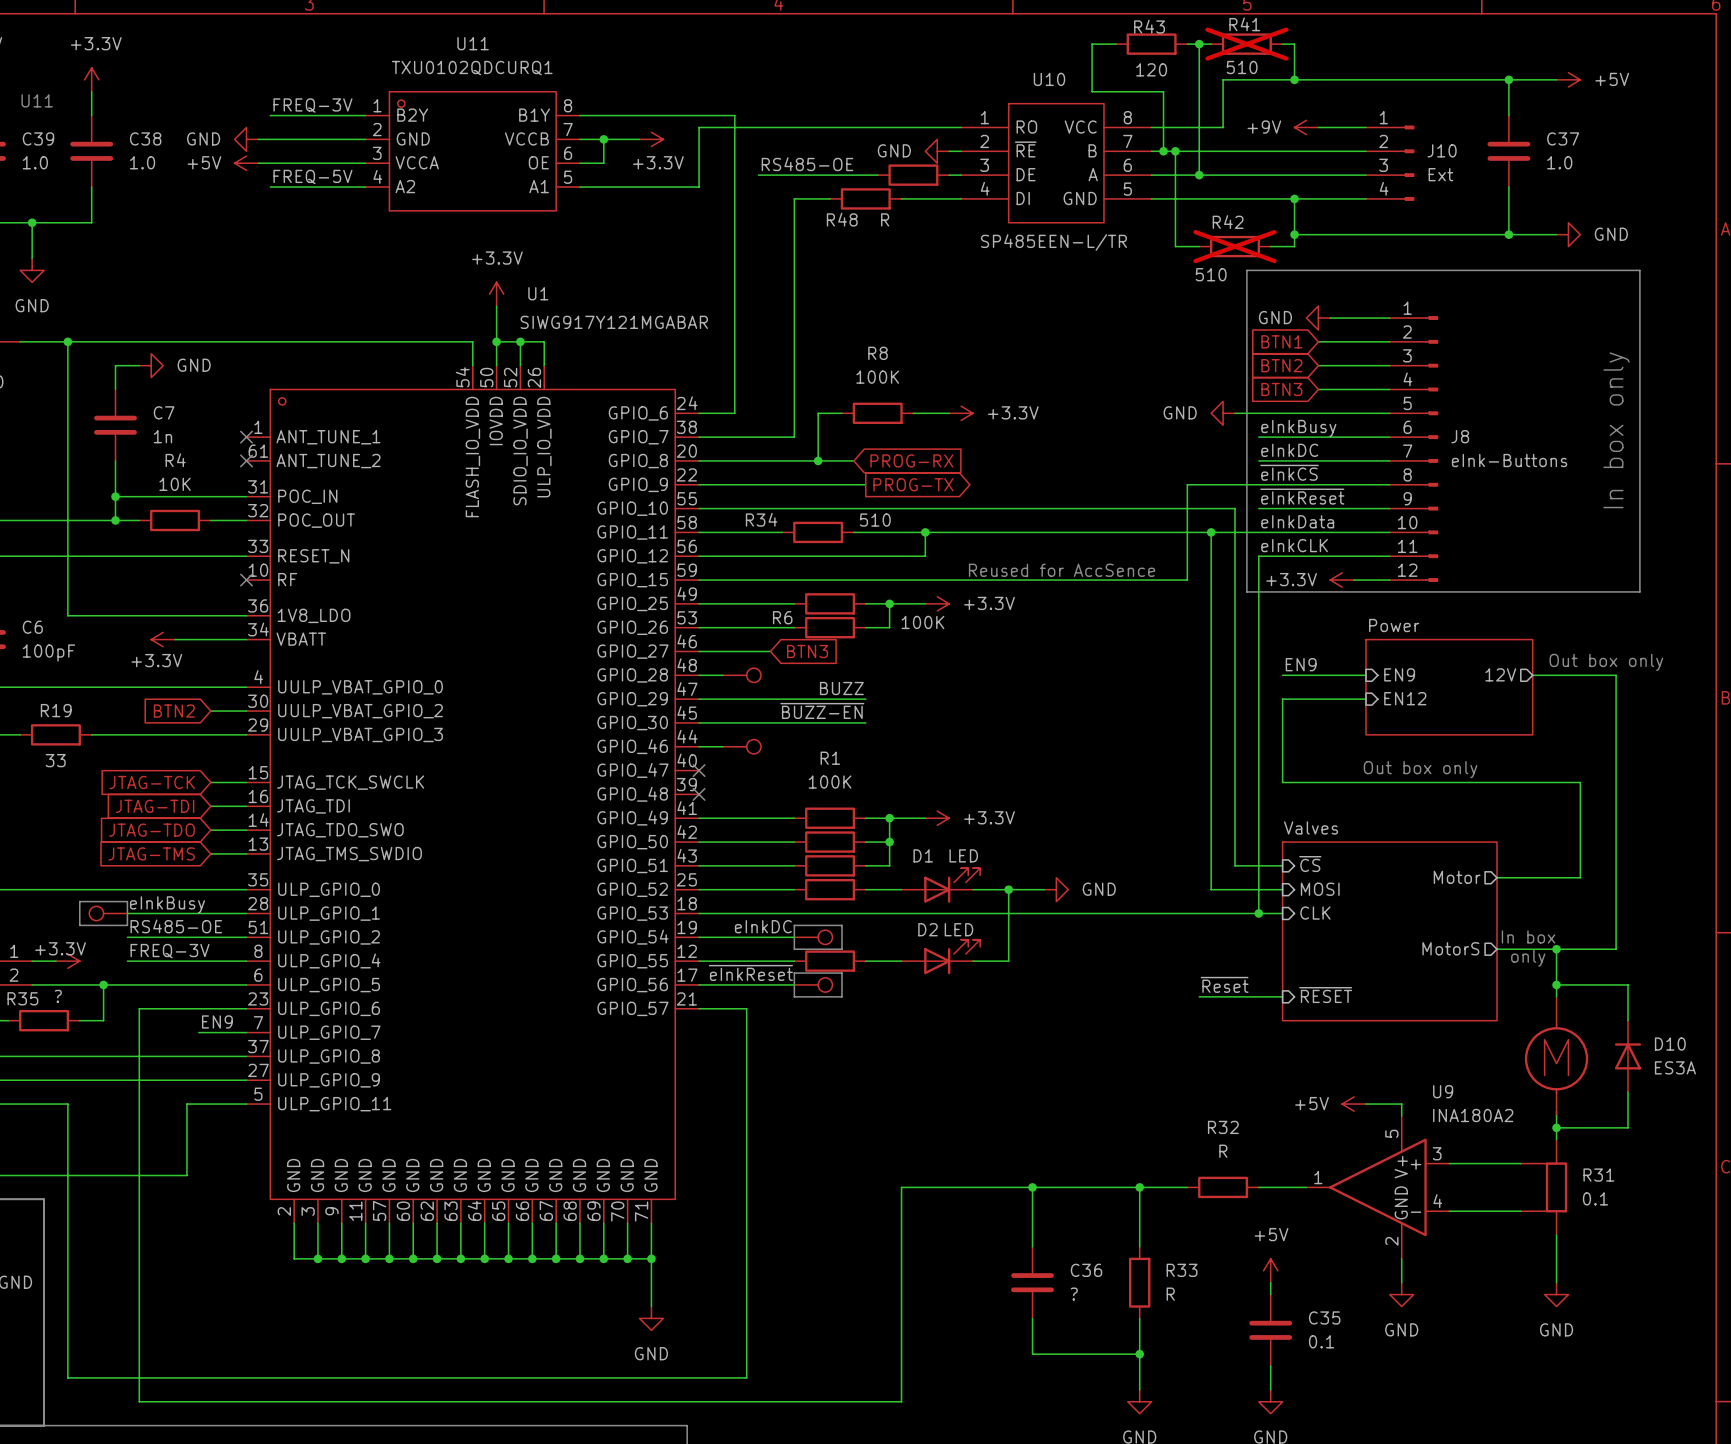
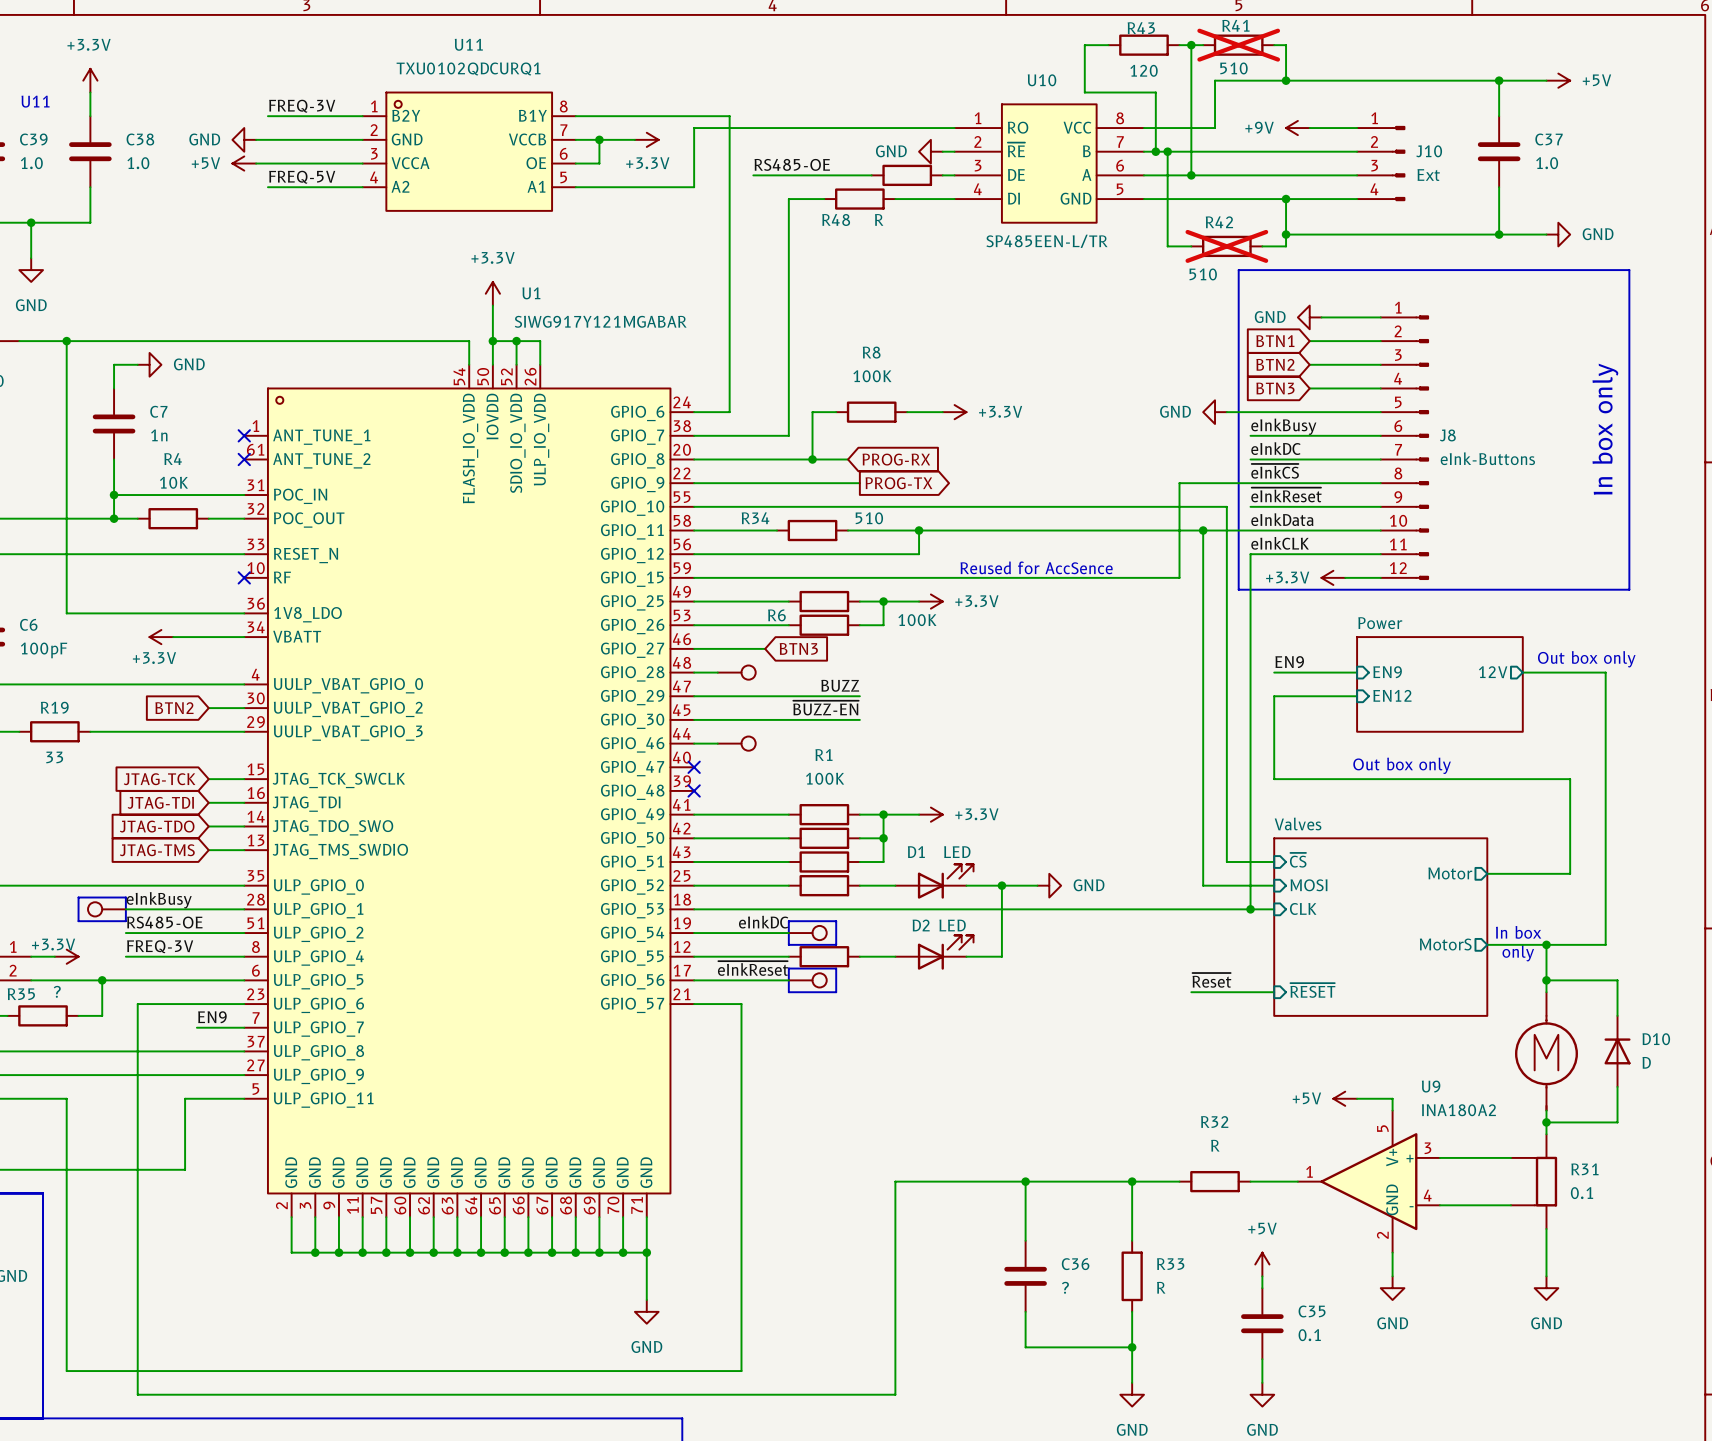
D10 value: ES3A (1675, 1067) -> D (1646, 1062)

